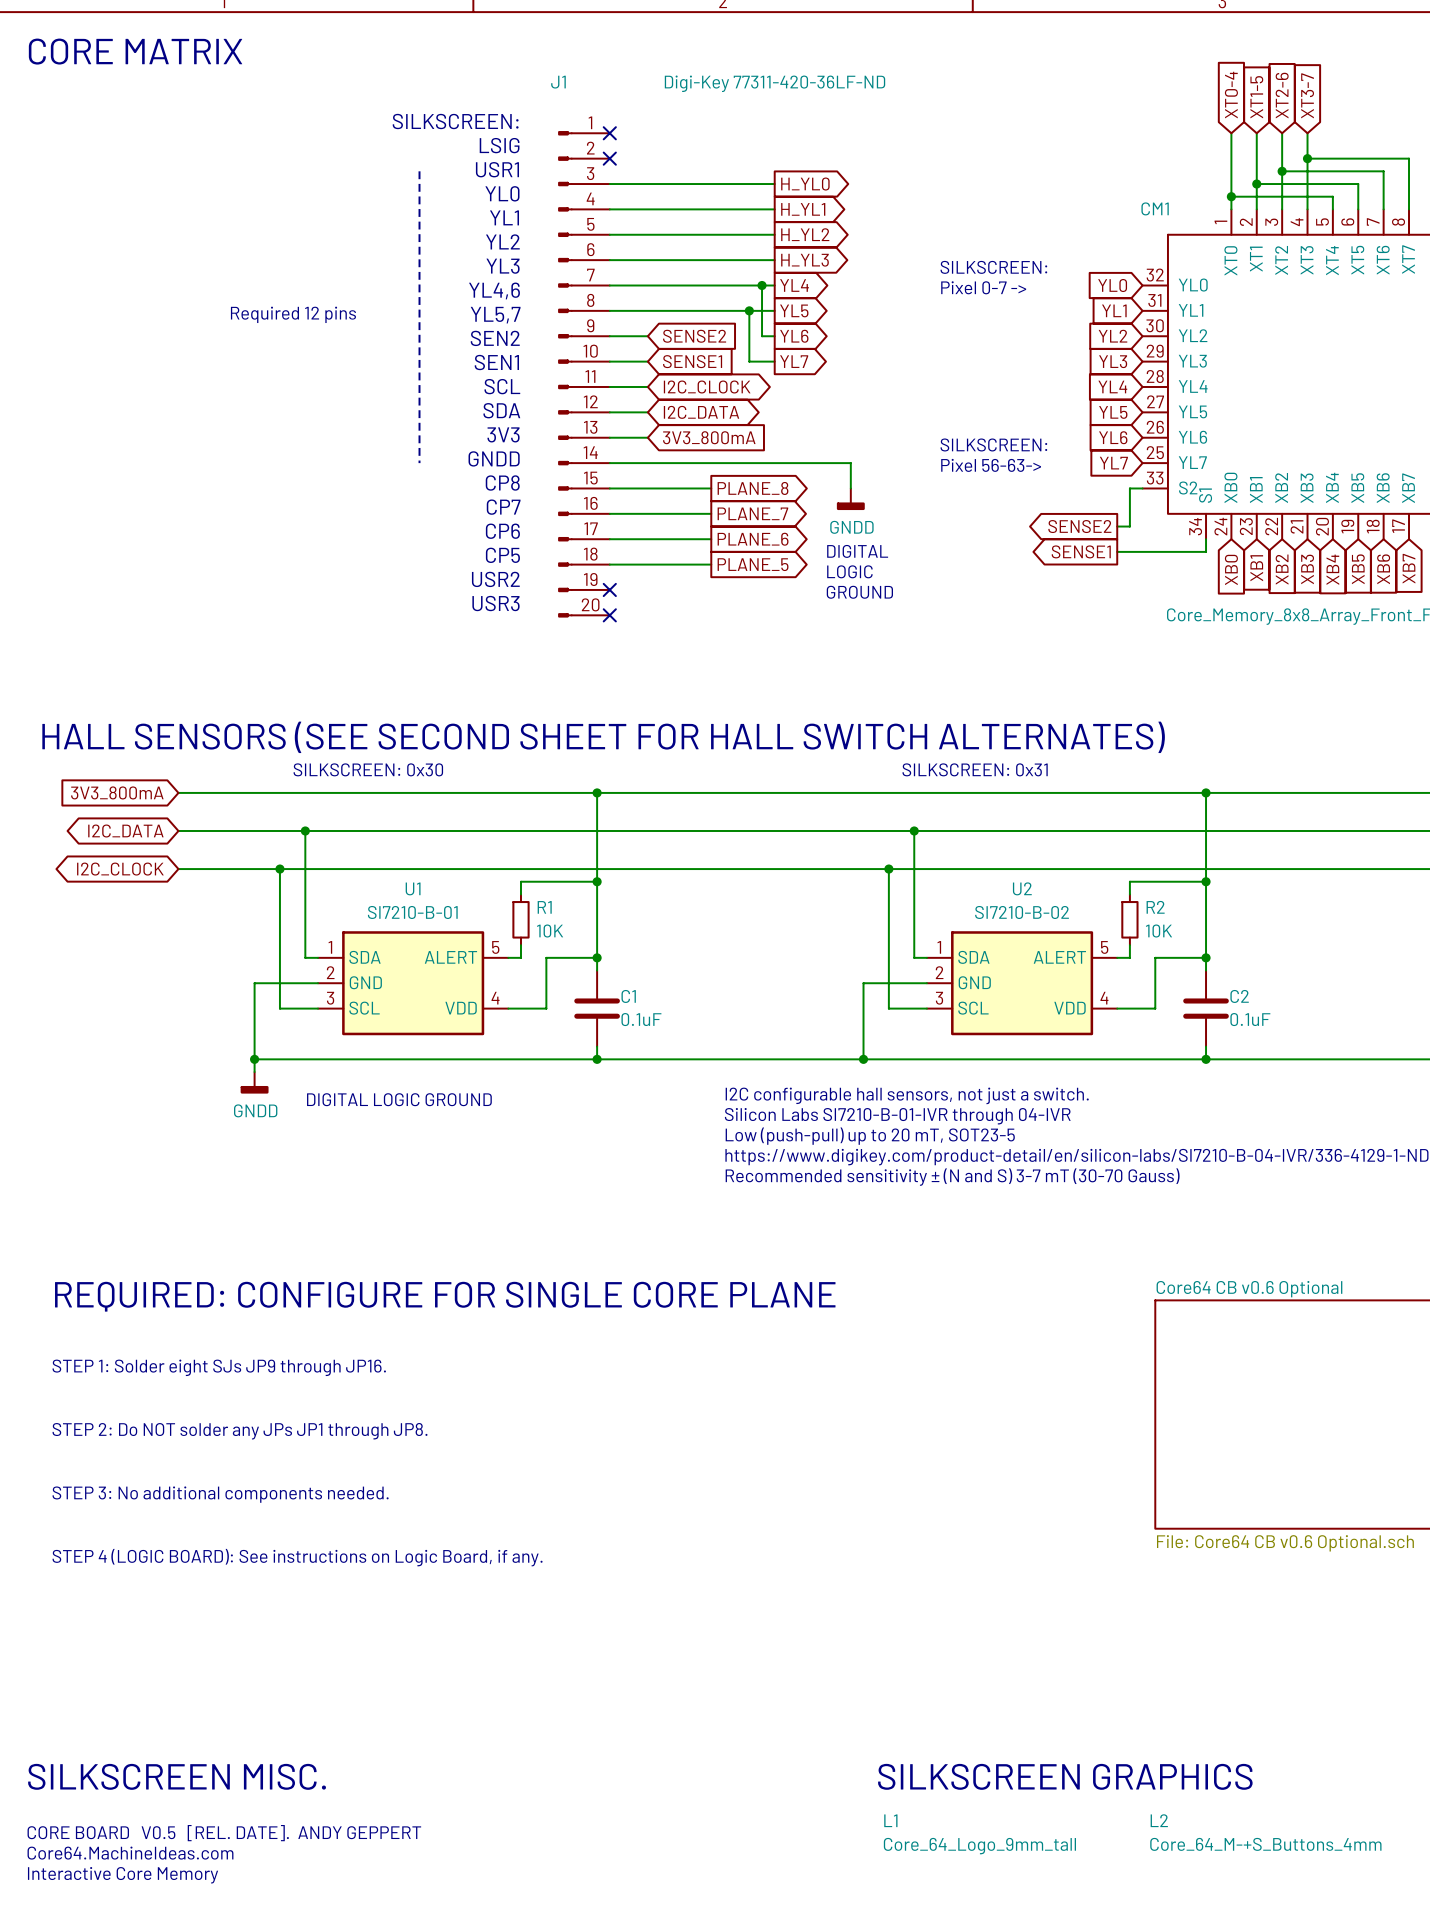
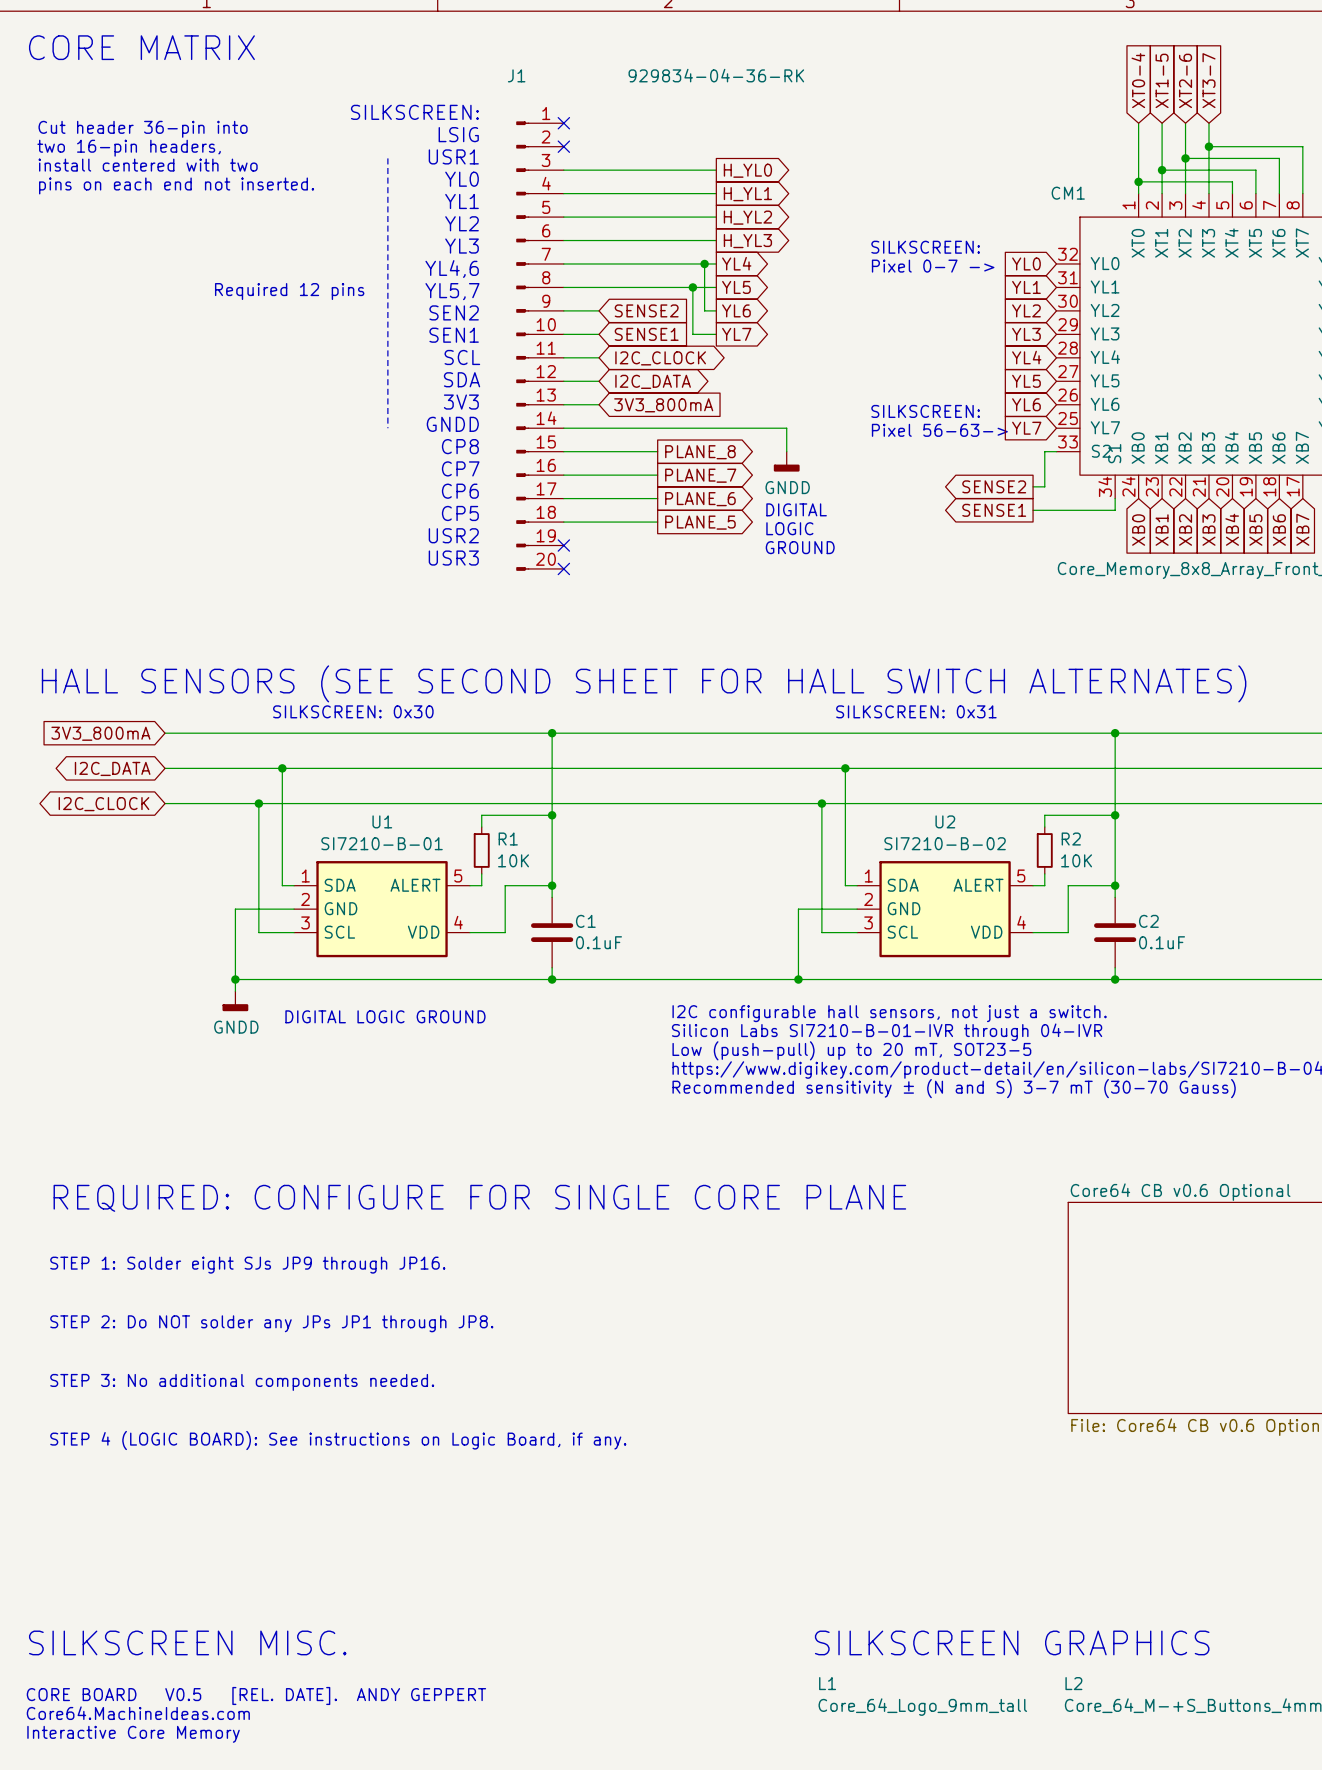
J1 value: Digi-Key 77311-420-36LF-ND (775, 83) -> 929834-04-36-RK (716, 75)
text: none -> Cut header 36-pin into (143, 129)
text: none -> two 16-pin headers, (129, 148)
text: none -> install centered with two (148, 165)
text: none -> pins on each end not inserted. (176, 185)

